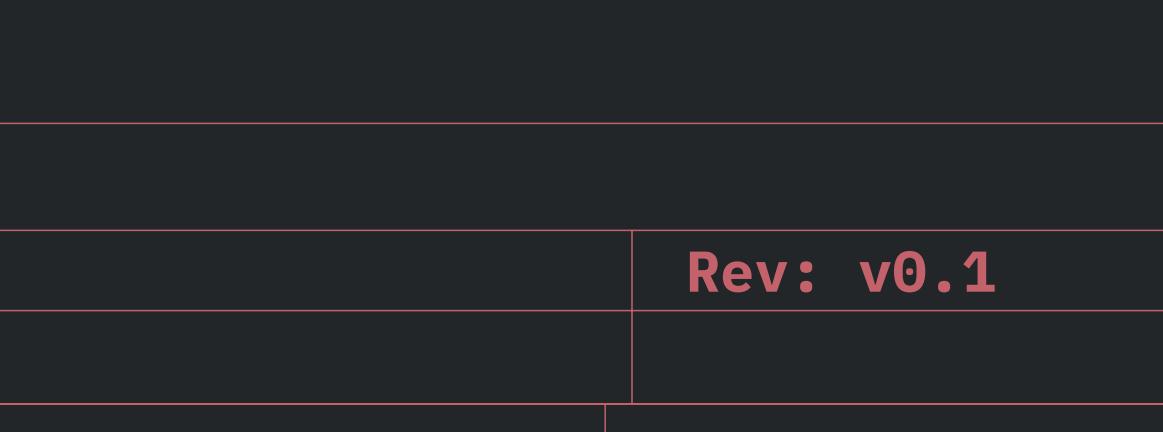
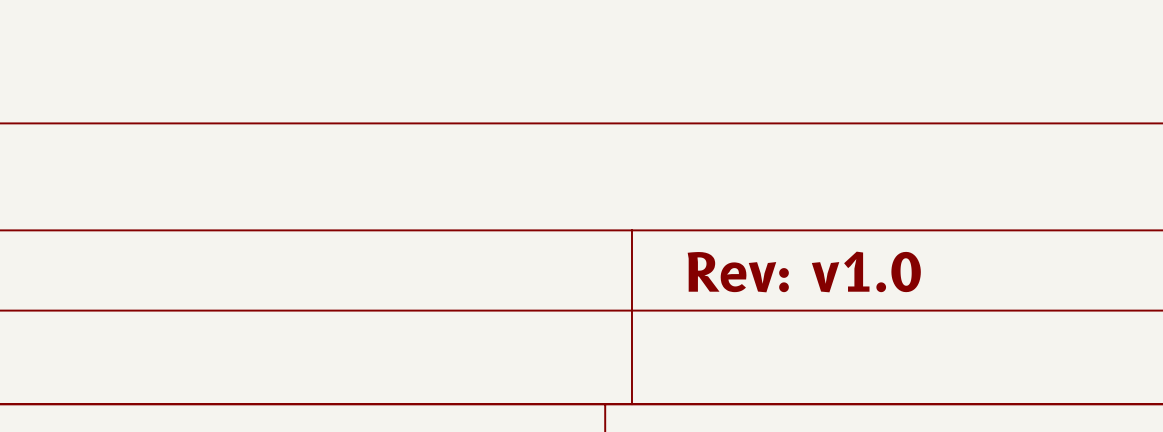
title block: Rev: v0.1 (842, 271) -> Rev: v1.0 (804, 272)

